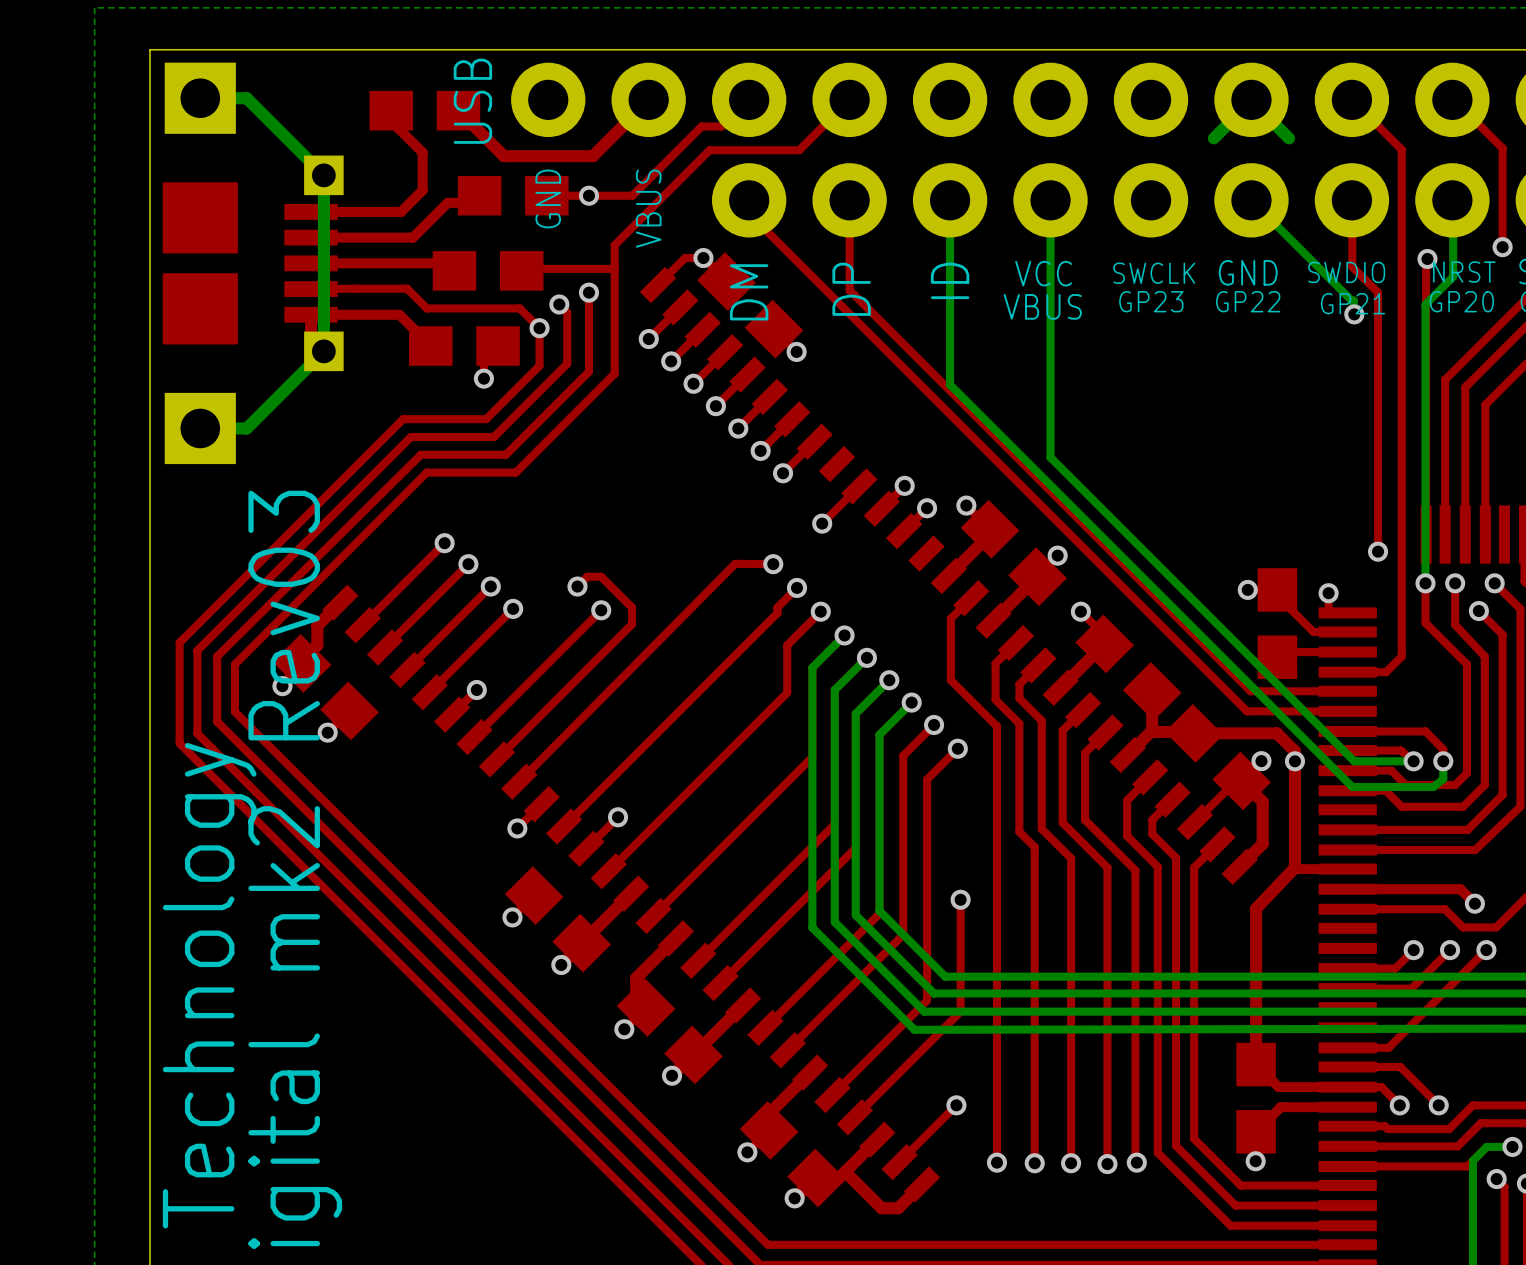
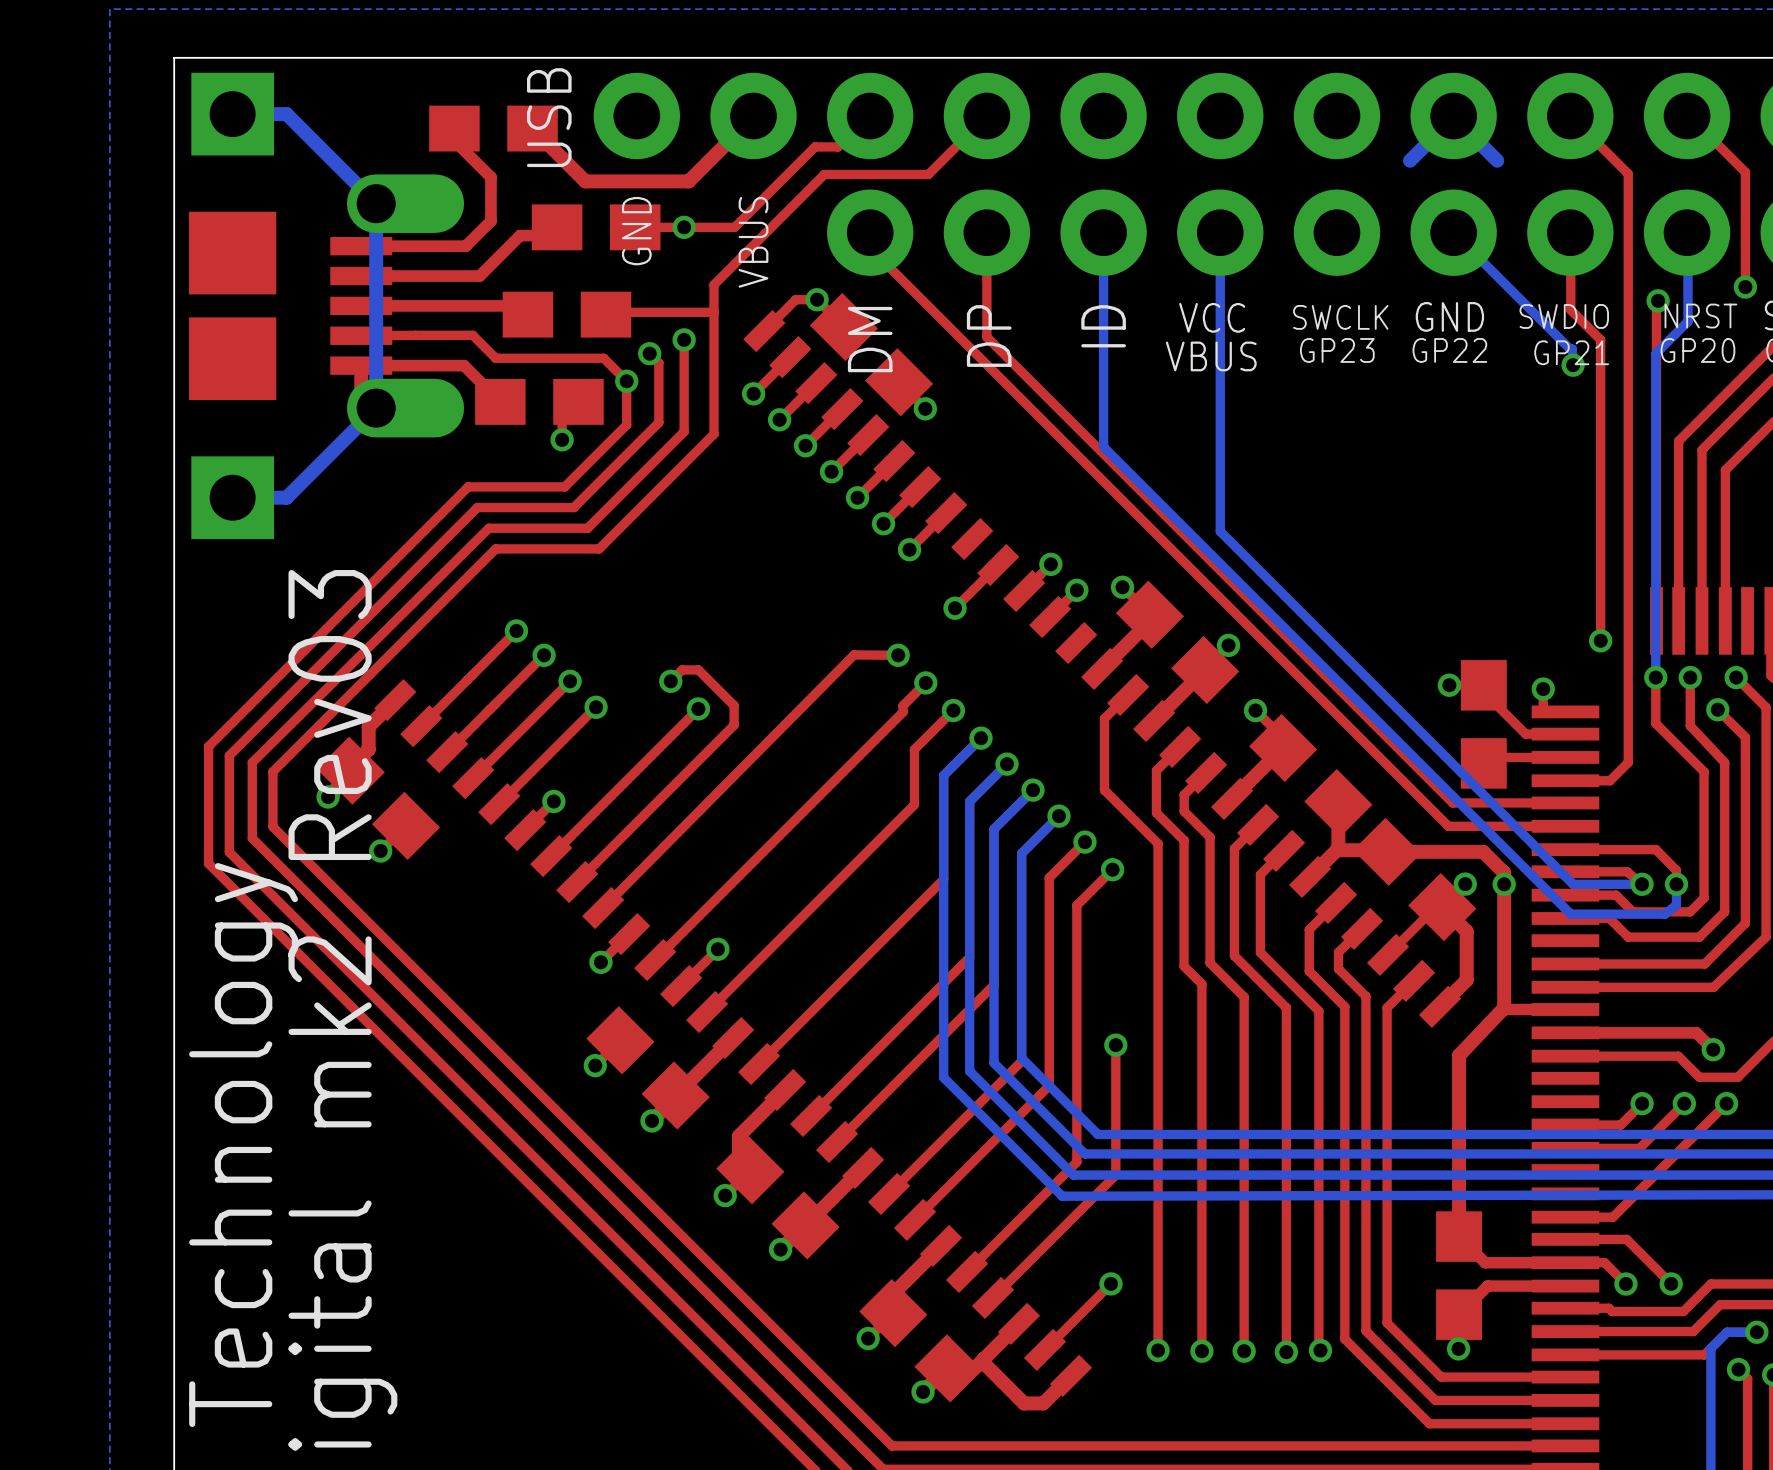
part footprint: [162, 62, 344, 465] -> [189, 72, 465, 540]

